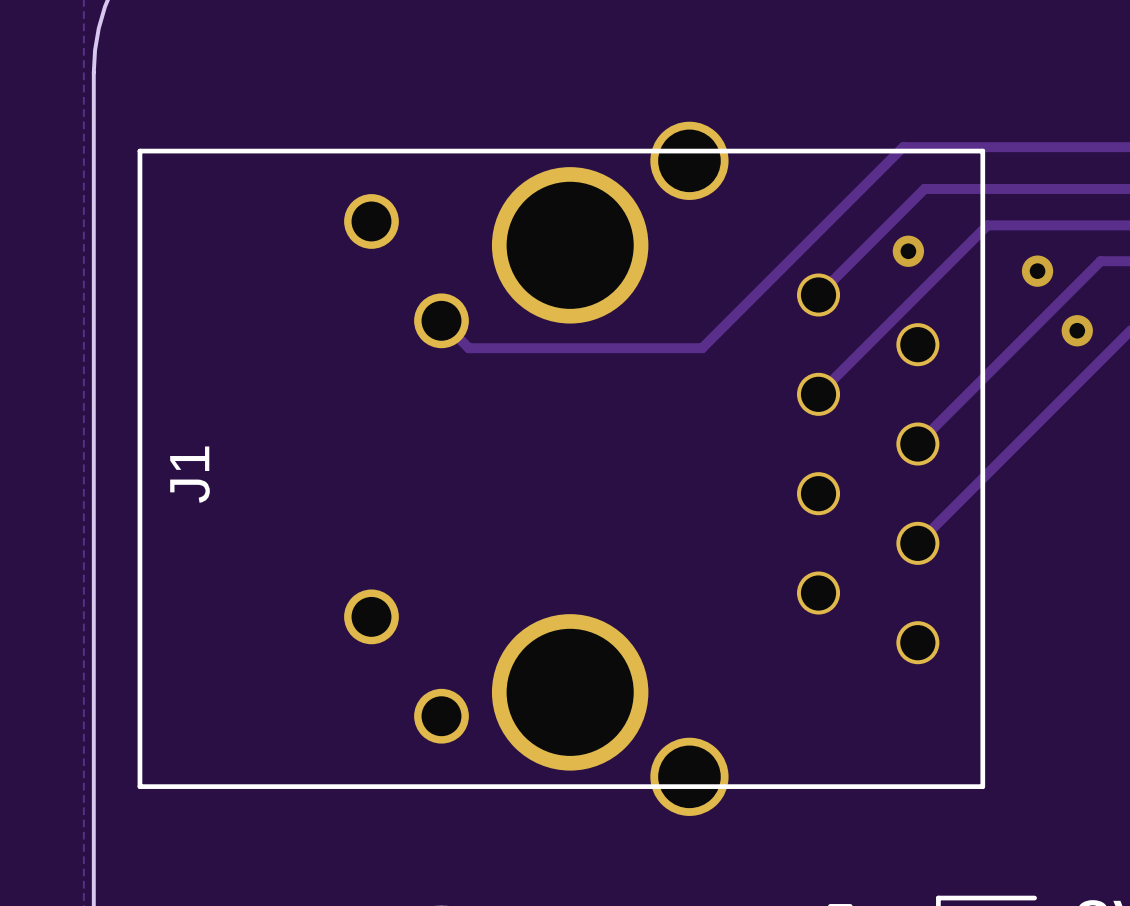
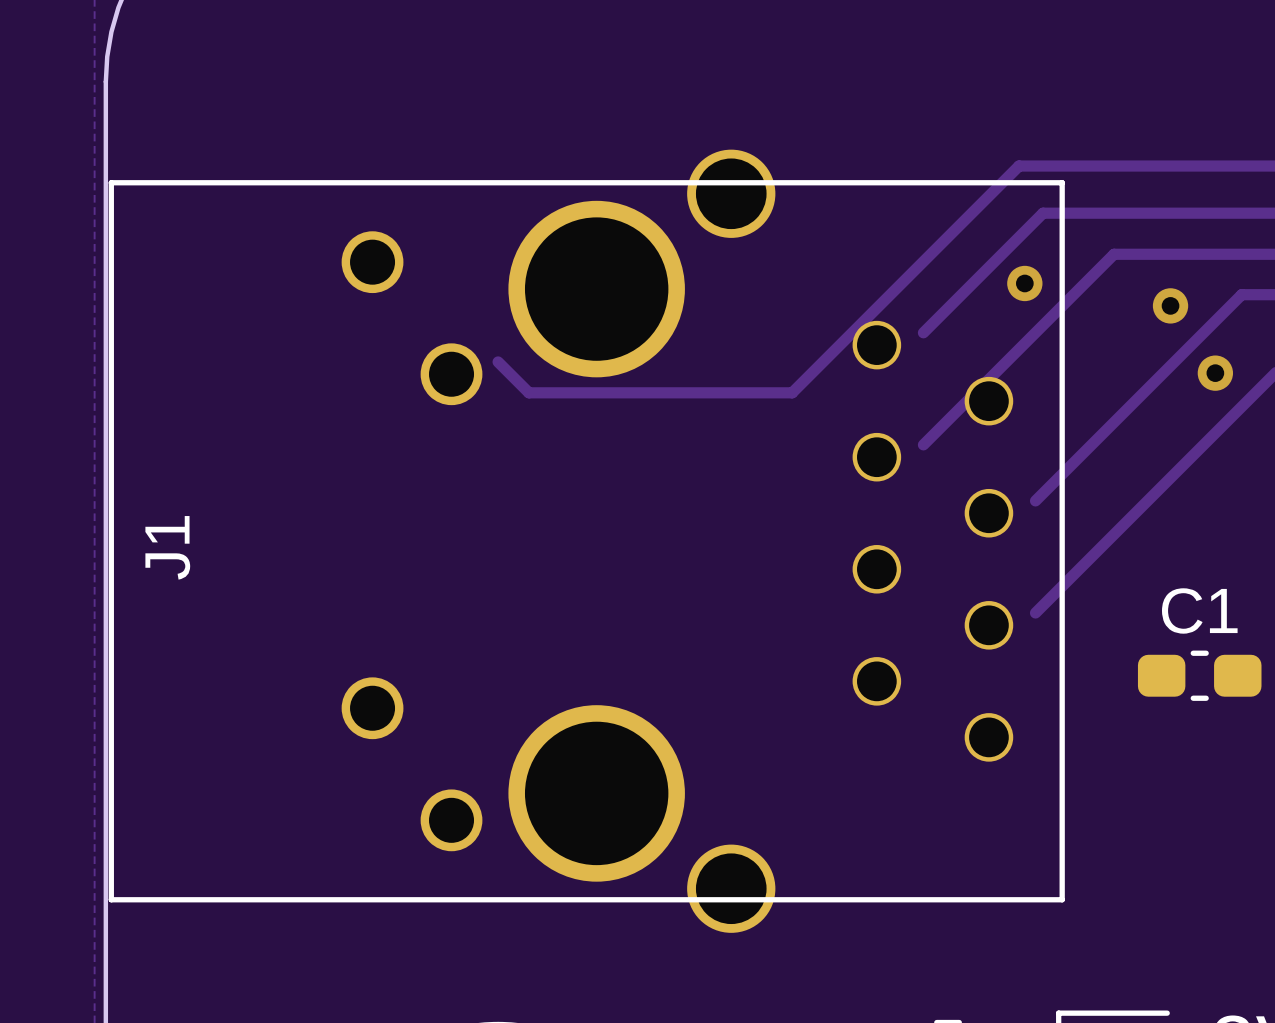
J1 position: (561, 468) -> (586, 541)
C1: none -> (1199, 675)

